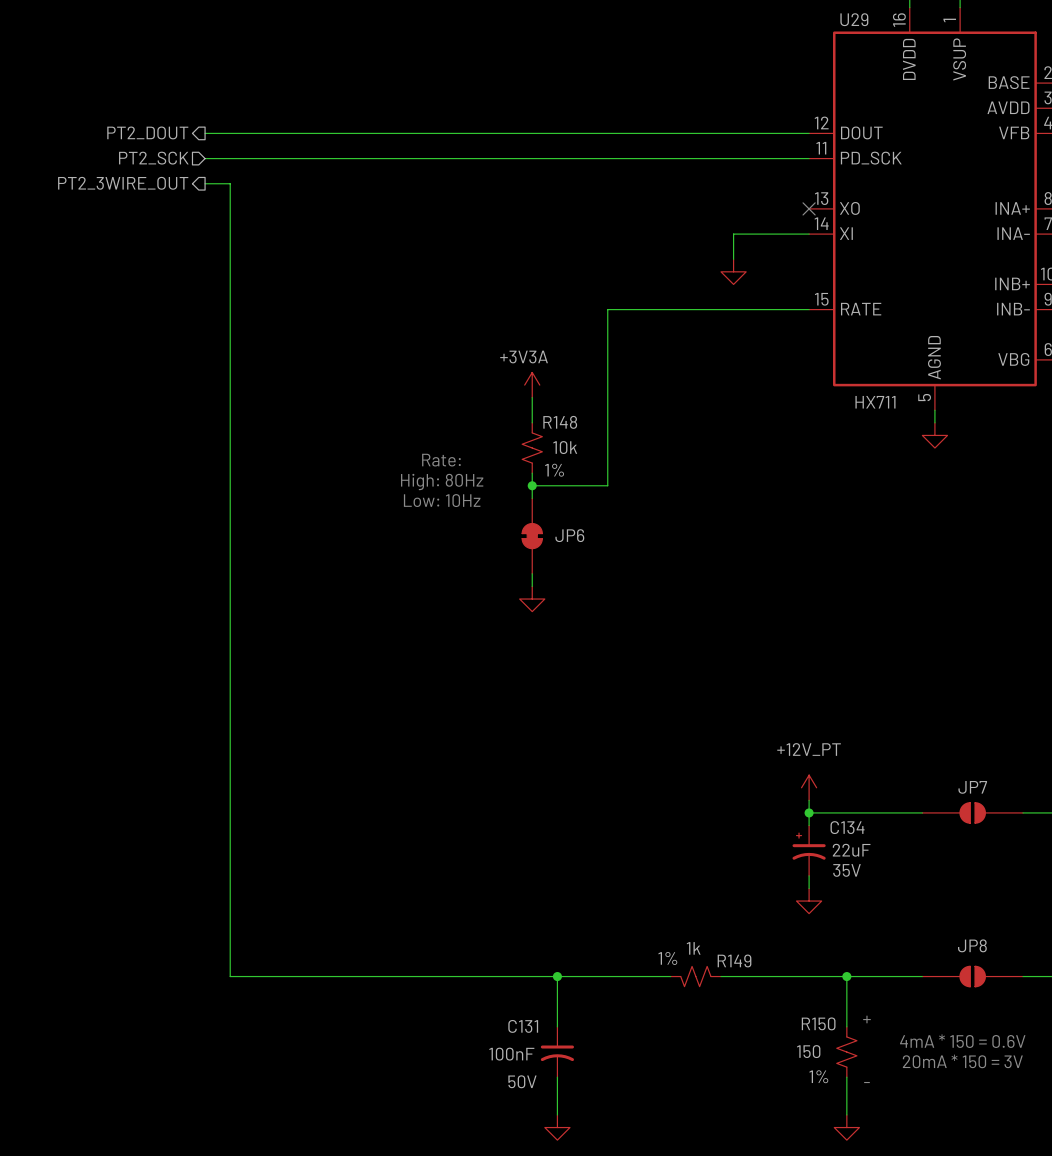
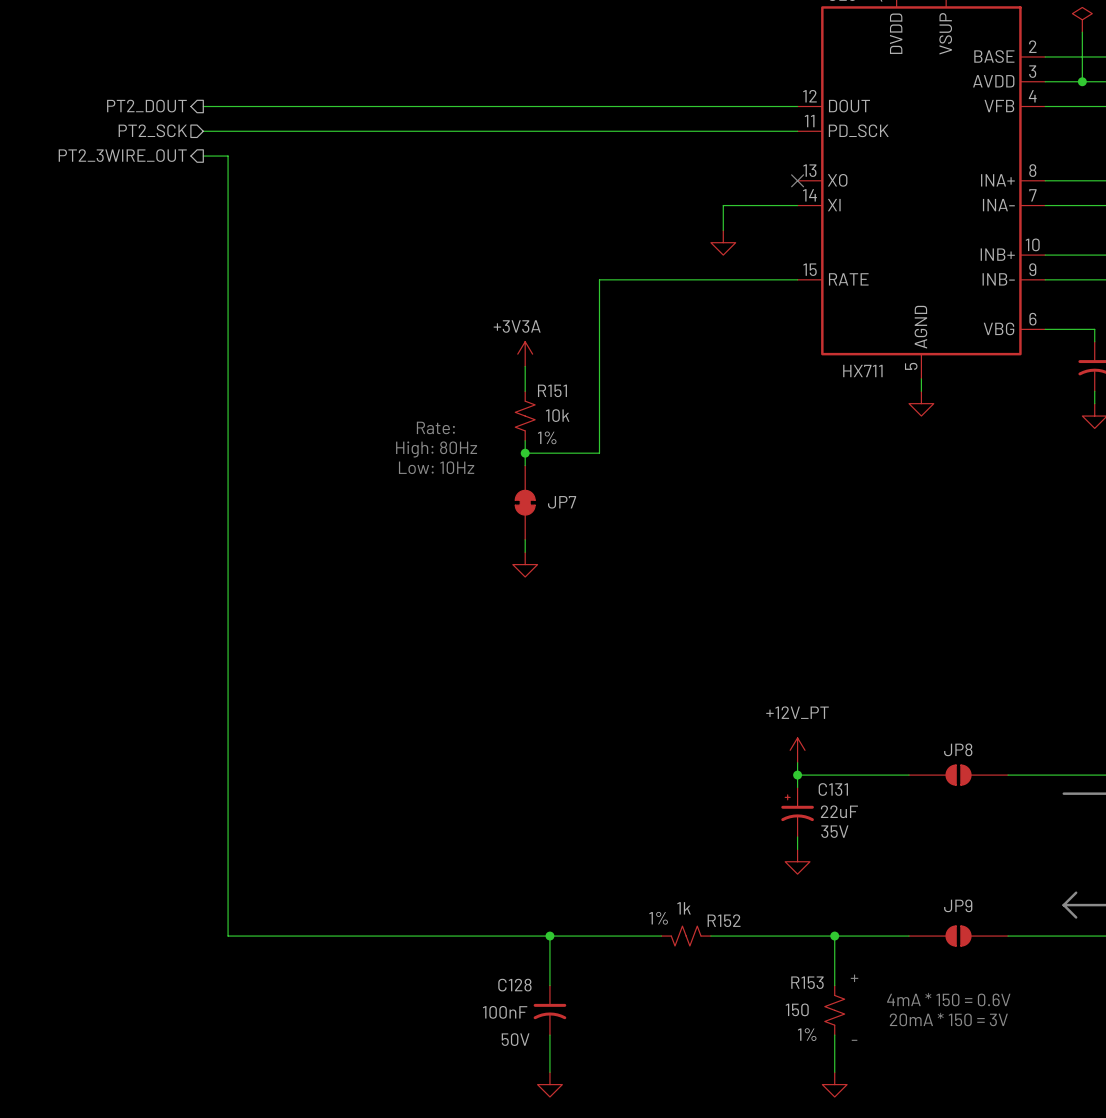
R148 name: R148 (560, 422) -> R151 (552, 390)
JP6 name: JP6 (569, 535) -> JP7 (562, 502)
JP7 name: JP7 (972, 787) -> JP8 (958, 749)
C134 name: C134 (847, 827) -> C131 (833, 789)
JP8 name: JP8 (972, 945) -> JP9 (958, 905)
R149 name: R149 (734, 960) -> R152 (724, 920)
R150 name: R150 (818, 1023) -> R153 (807, 982)
C131 name: C131 (523, 1026) -> C128 (514, 985)

